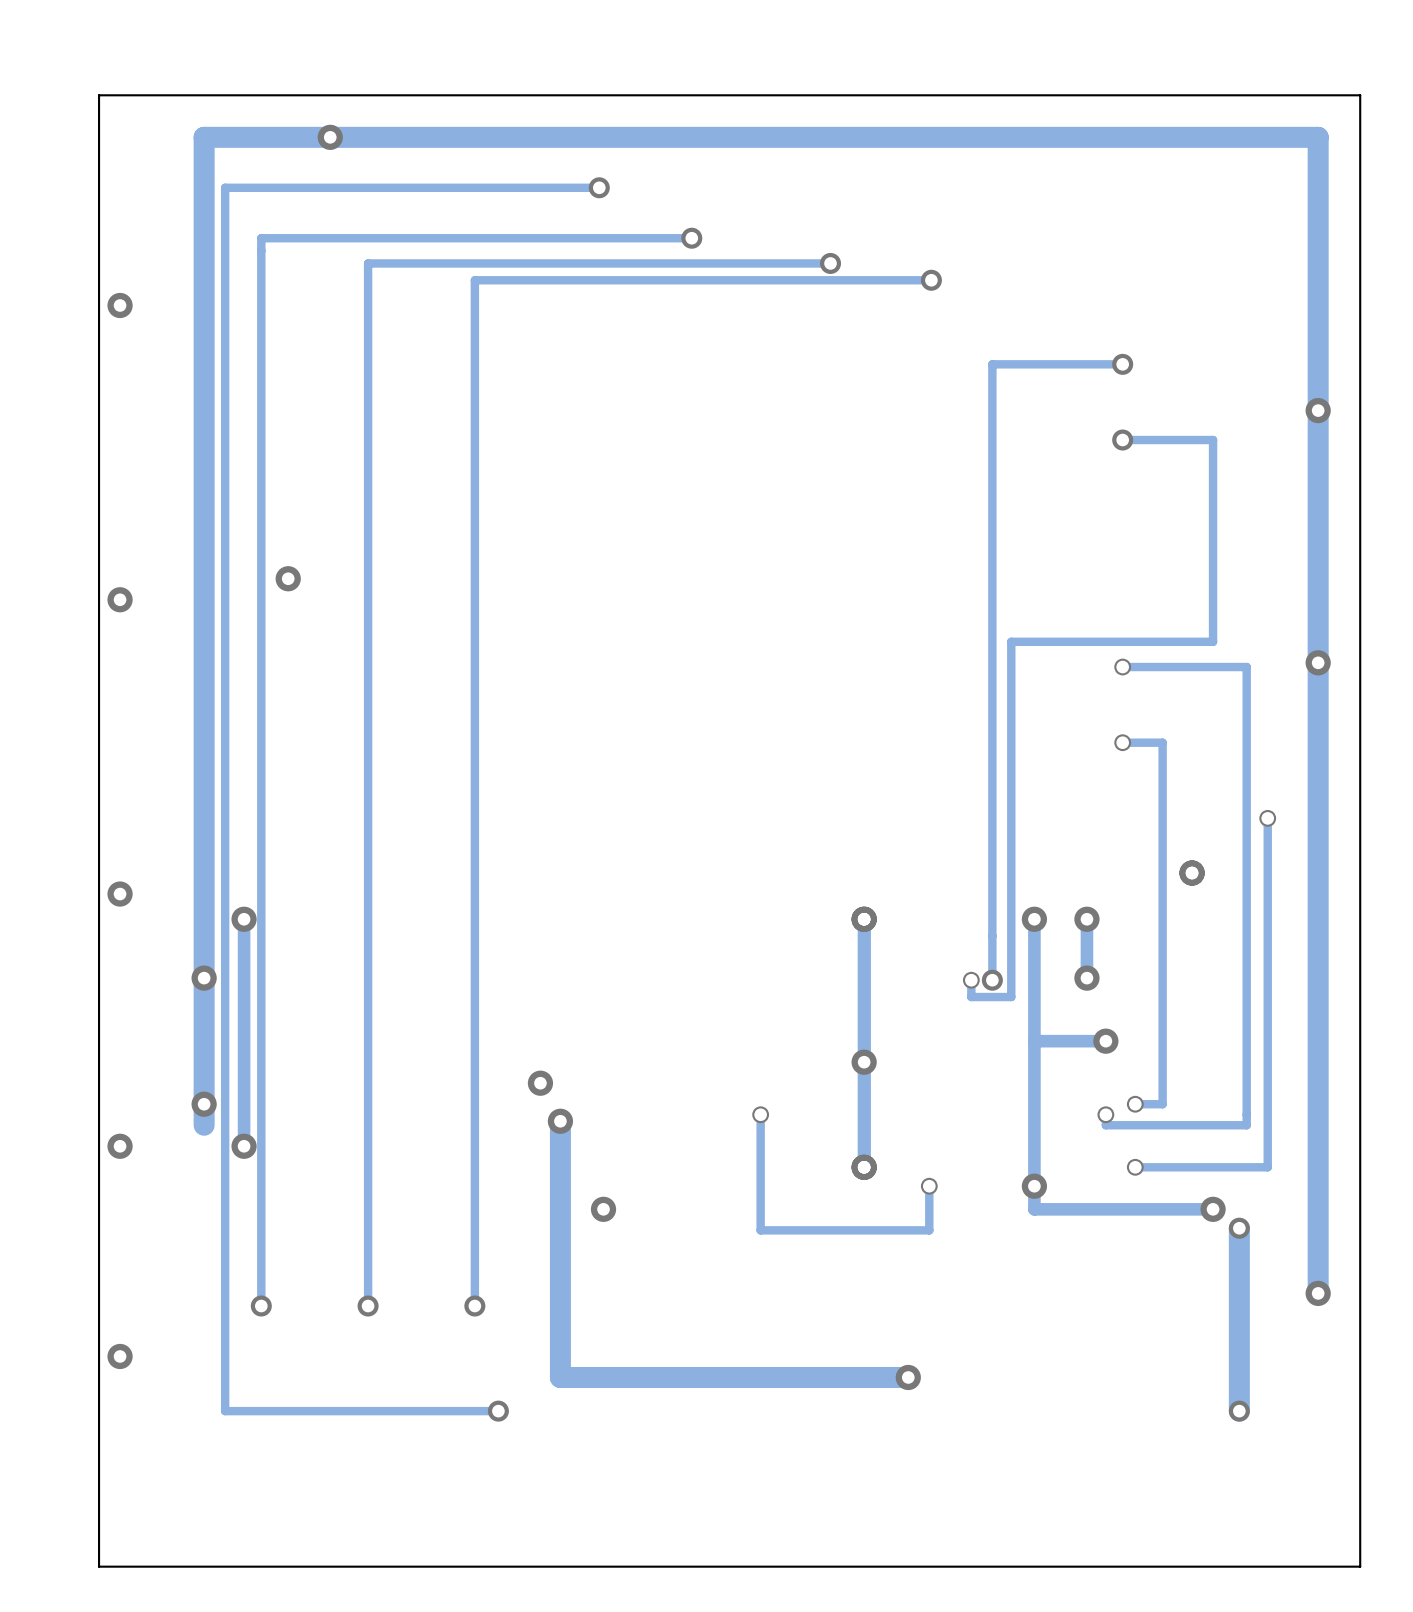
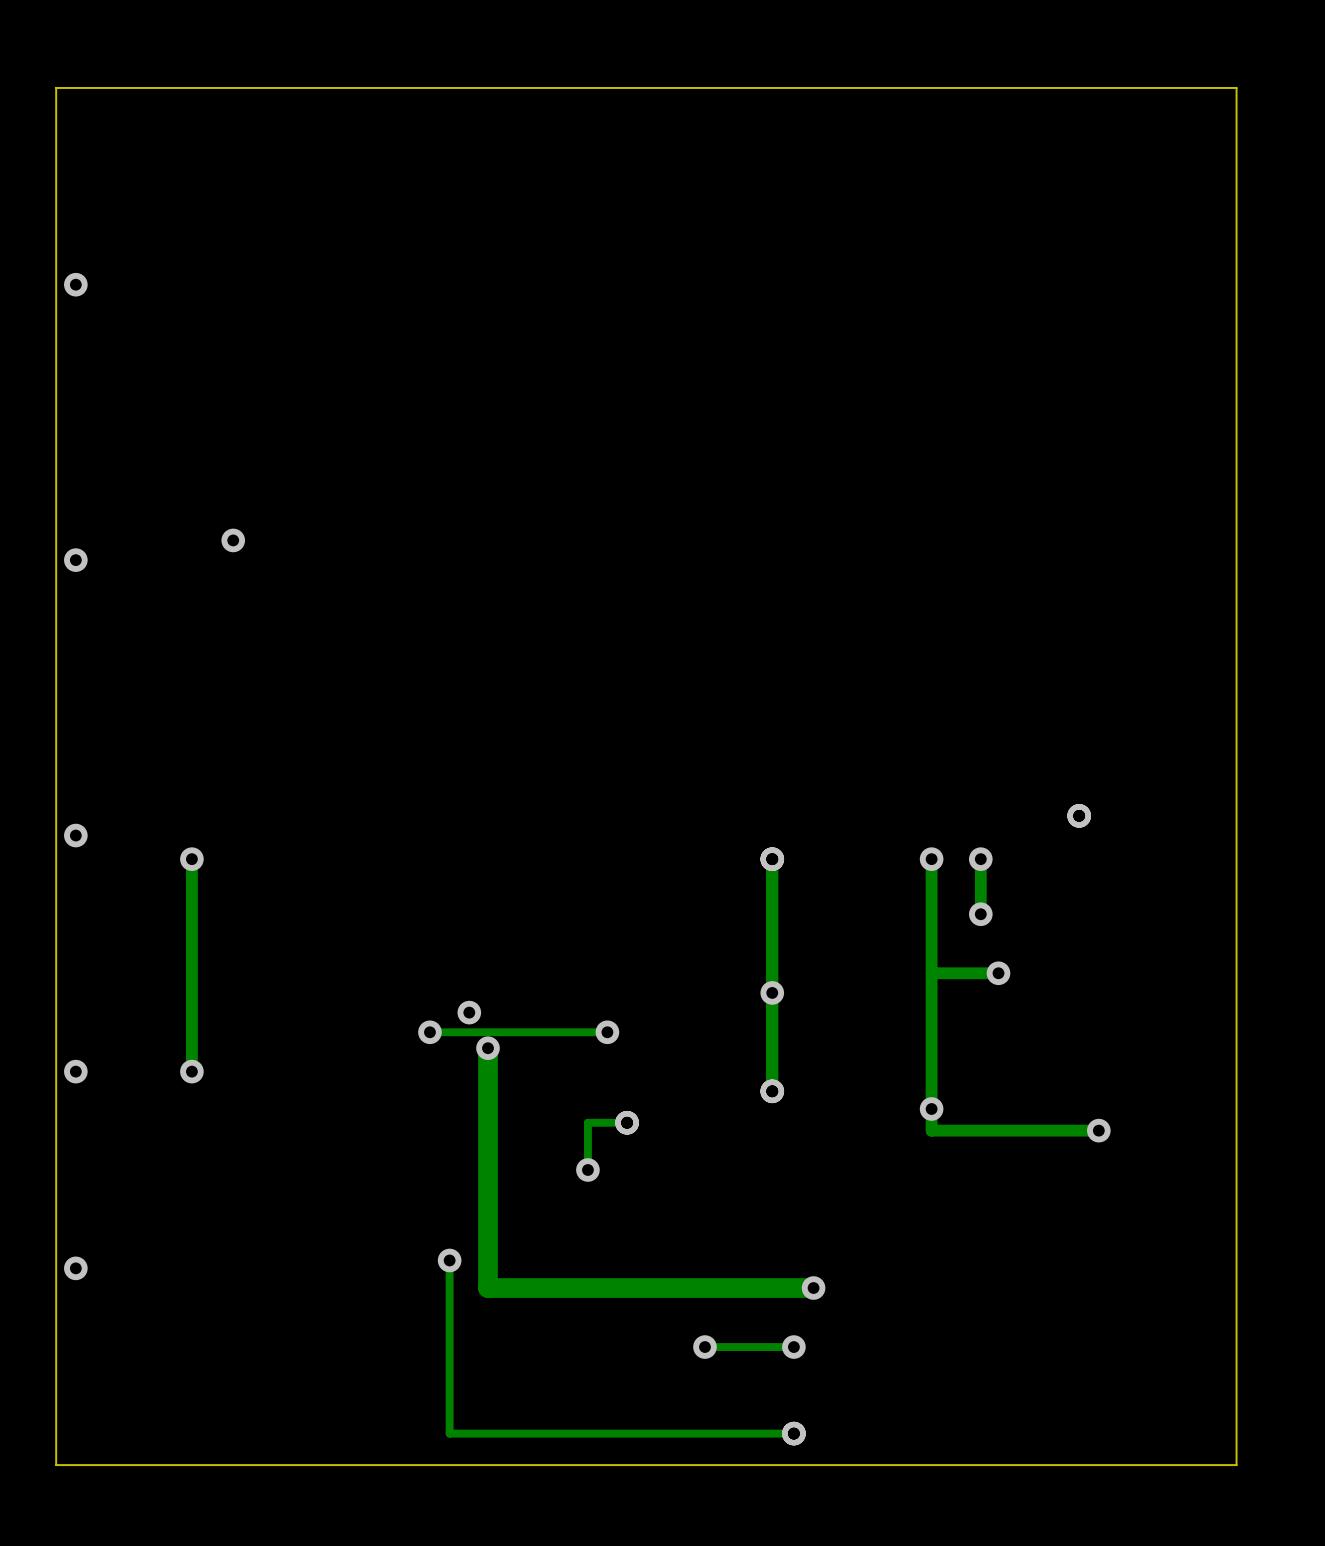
via: (330, 137) -> none
track: (599, 187) (225, 187) (225, 1411) (498, 1411) -> none
via: (599, 187) -> none
track: (691, 238) (261, 238) (261, 1306) -> none
via: (691, 238) -> none
track: (830, 263) (368, 263) (368, 1306) -> none
via: (830, 263) -> none
track: (931, 280) (474, 280) (474, 1306) -> none
via: (931, 280) -> none
track: (1122, 364) (992, 364) (992, 980) -> none
via: (1122, 364) -> none
via: (1318, 410) -> none
track: (1122, 440) (1213, 440) (1213, 641) (1011, 641) (1011, 997) (971, 997) (971, 980) -> none
via: (1122, 440) -> none
via: (1318, 662) -> none
track: (1122, 667) (1246, 667) (1246, 1125) (1105, 1125) (1105, 1114) -> none
via: (1122, 667) -> none
track: (1122, 742) (1162, 742) (1162, 1104) (1135, 1104) -> none
via: (1122, 742) -> none
track: (1267, 818) (1267, 1167) (1135, 1167) -> none
via: (1267, 818) -> none
via: (204, 978) -> none
via: (971, 980) -> none
via: (992, 980) -> none
via: (204, 1104) -> none
via: none -> (429, 1032)
track: none -> (607, 1032) (429, 1032)
via: none -> (607, 1032)
via: (1135, 1104) -> none
track: (760, 1114) (760, 1230) (929, 1230) (929, 1186) -> none
via: (760, 1114) -> none
via: (1105, 1114) -> none
track: (204, 1125) (204, 137) (1318, 137) (1318, 1293) -> none
via: (1135, 1167) -> none
via: (929, 1186) -> none
track: none -> (627, 1122) (587, 1122) (587, 1169)
via: none -> (627, 1122)
via: (603, 1209) -> none
track: (1239, 1228) (1239, 1411) -> none
via: (1239, 1228) -> none
via: none -> (587, 1169)
via: (1318, 1293) -> none
via: (261, 1306) -> none
via: (368, 1306) -> none
via: (474, 1306) -> none
track: none -> (449, 1260) (449, 1433) (793, 1433)
via: none -> (449, 1260)
via: (498, 1411) -> none
via: (1239, 1411) -> none
via: none -> (704, 1347)
track: none -> (793, 1347) (704, 1347)
via: none -> (793, 1347)
via: none -> (793, 1433)

